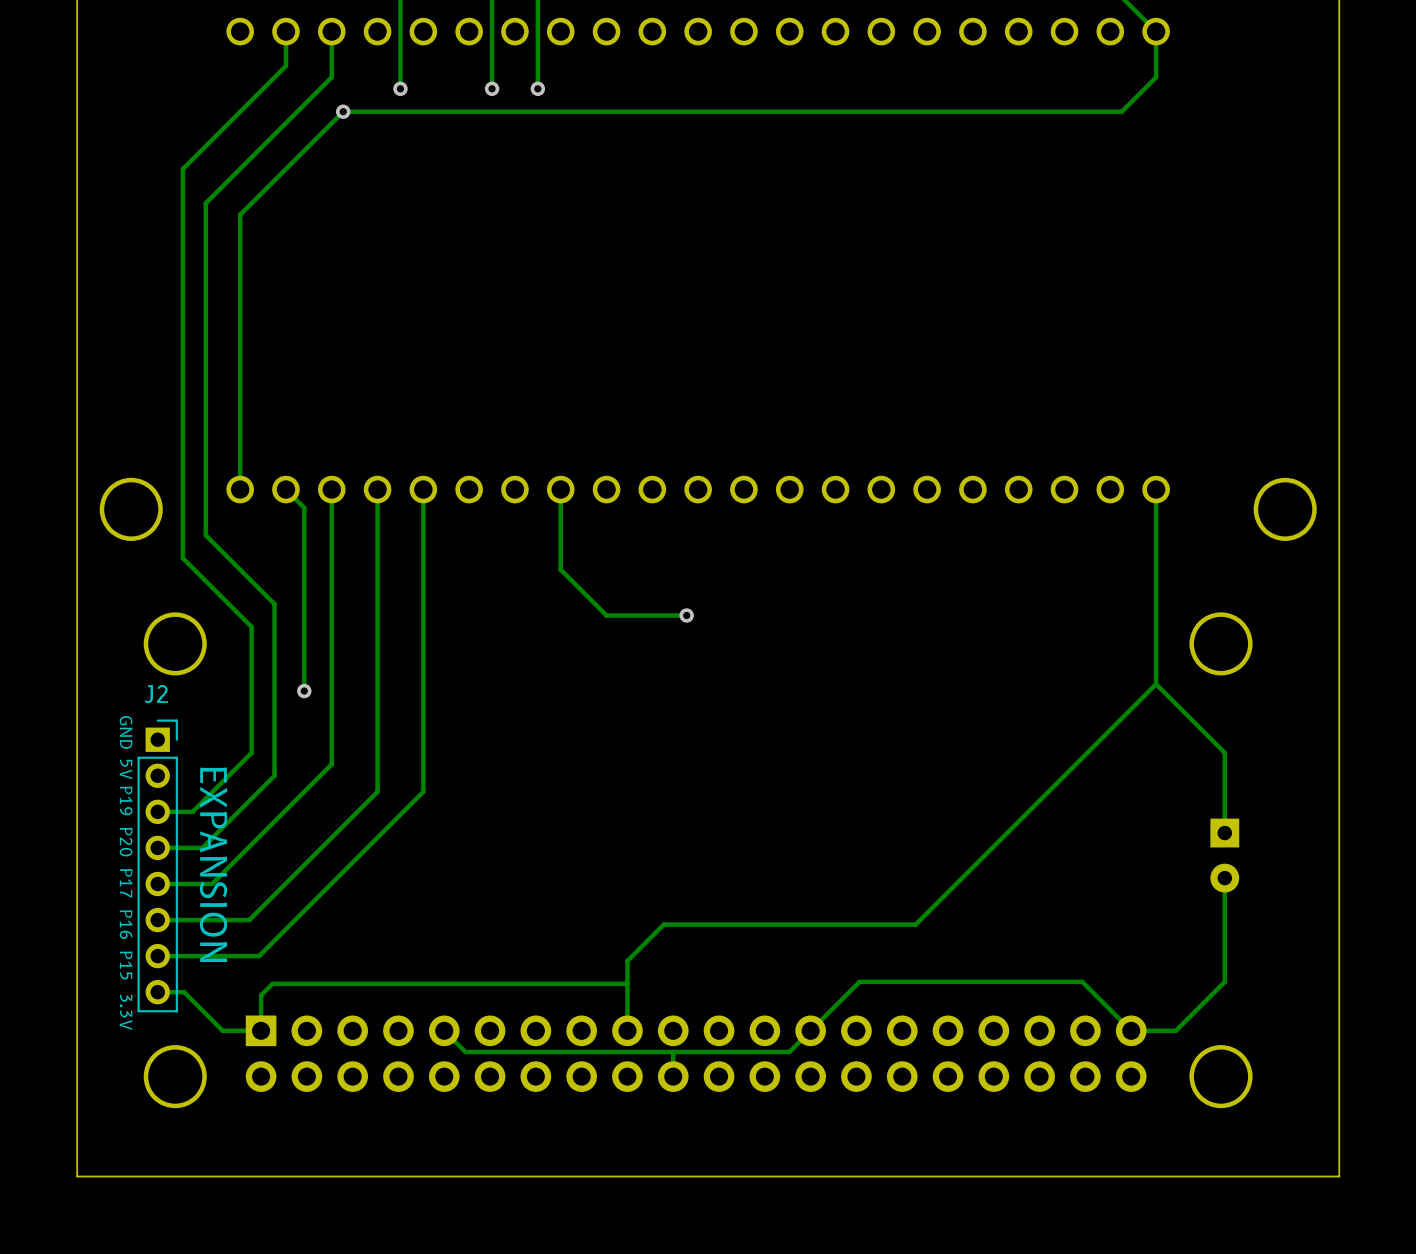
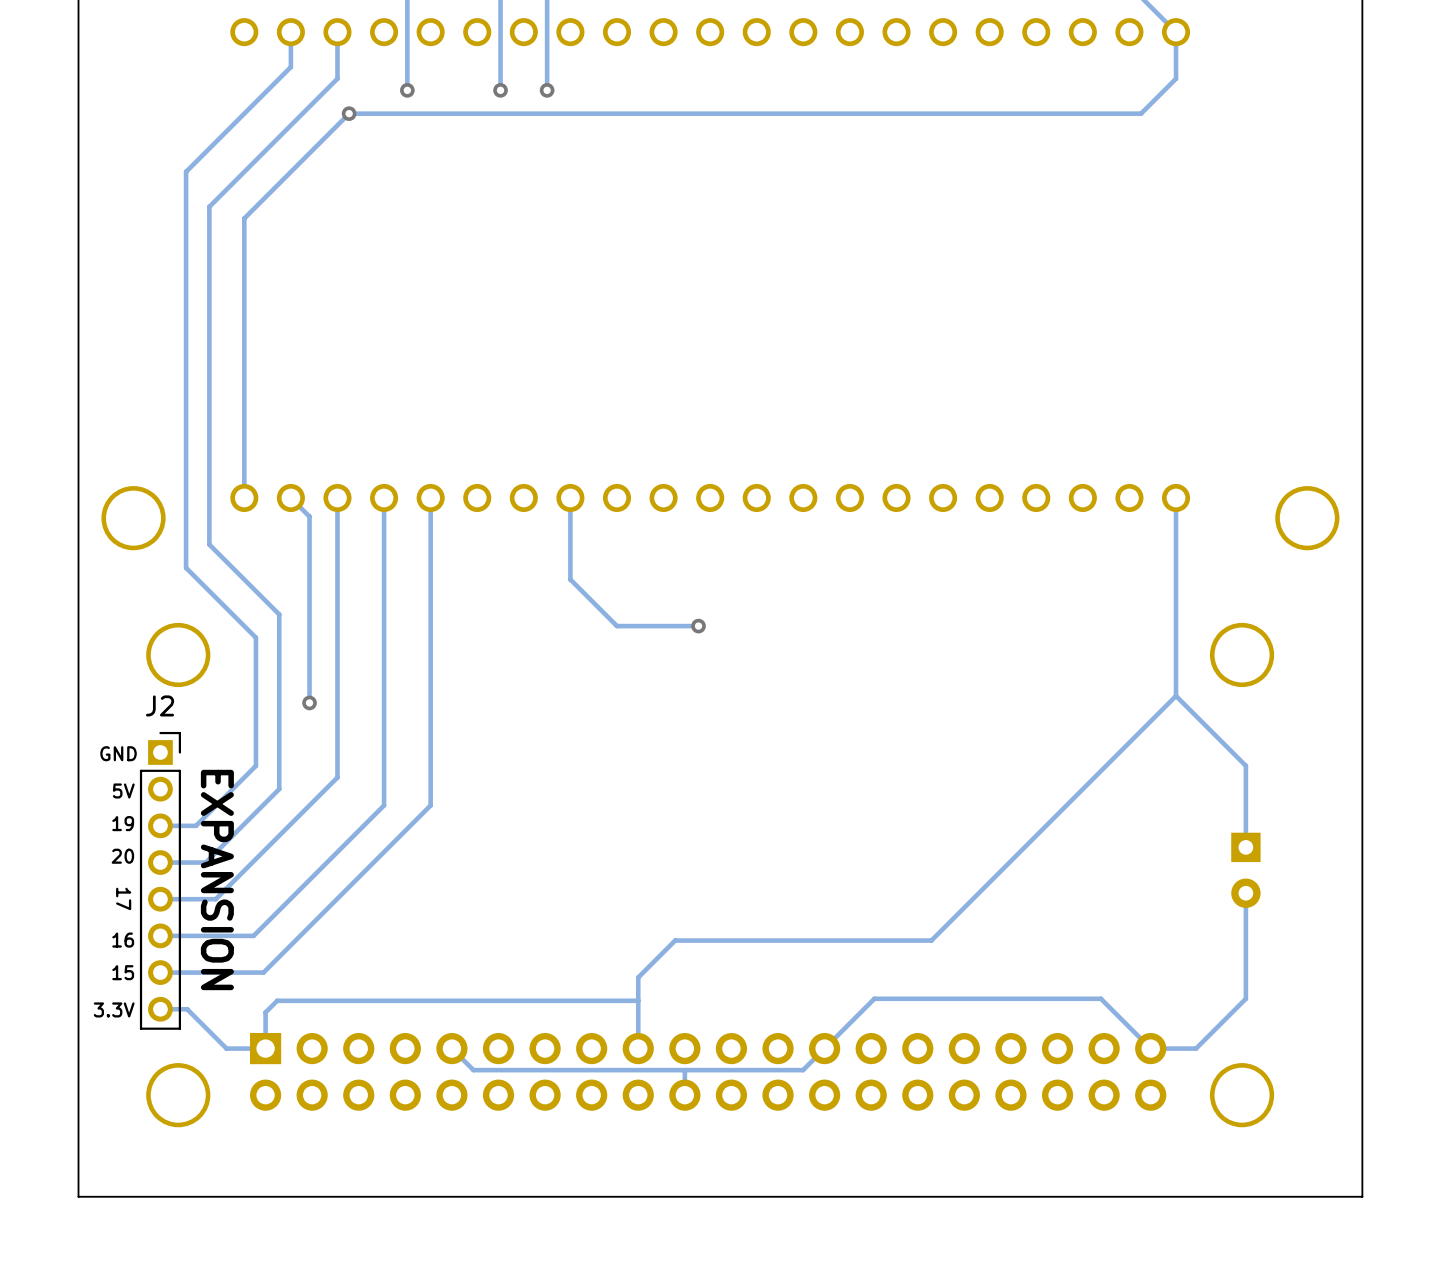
text rotation: 0° (126, 732) -> 90° counterclockwise (118, 753)
text rotation: 0° (126, 769) -> 90° counterclockwise (123, 791)
text: P19 (126, 800) -> 19 (123, 823)
text: P20 (126, 842) -> 20 (122, 856)
text: P17 (126, 883) -> 17 (123, 898)
text: P16 (126, 924) -> 16 (123, 940)
text: P15 (126, 965) -> 15 (123, 972)
text rotation: 0° (126, 1012) -> 90° counterclockwise (114, 1009)

